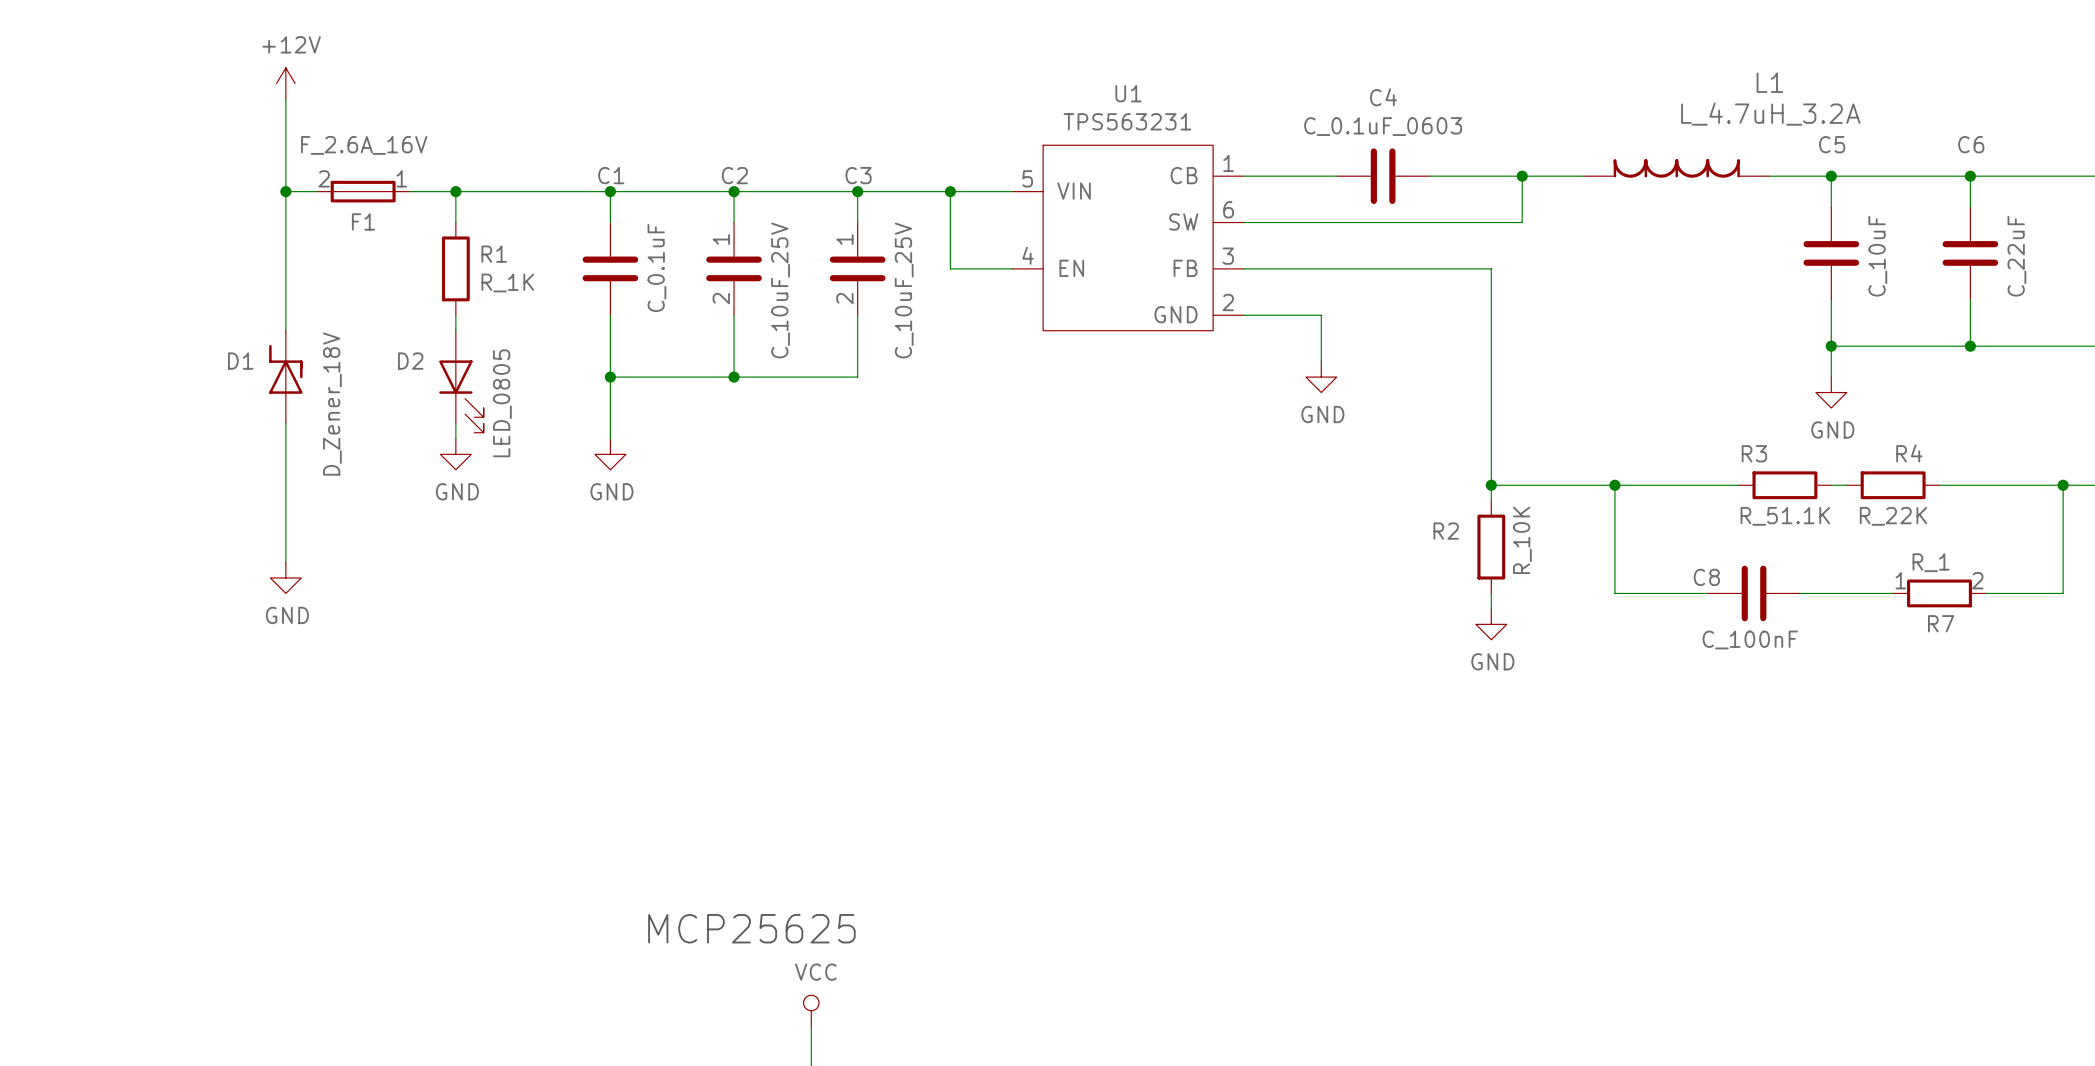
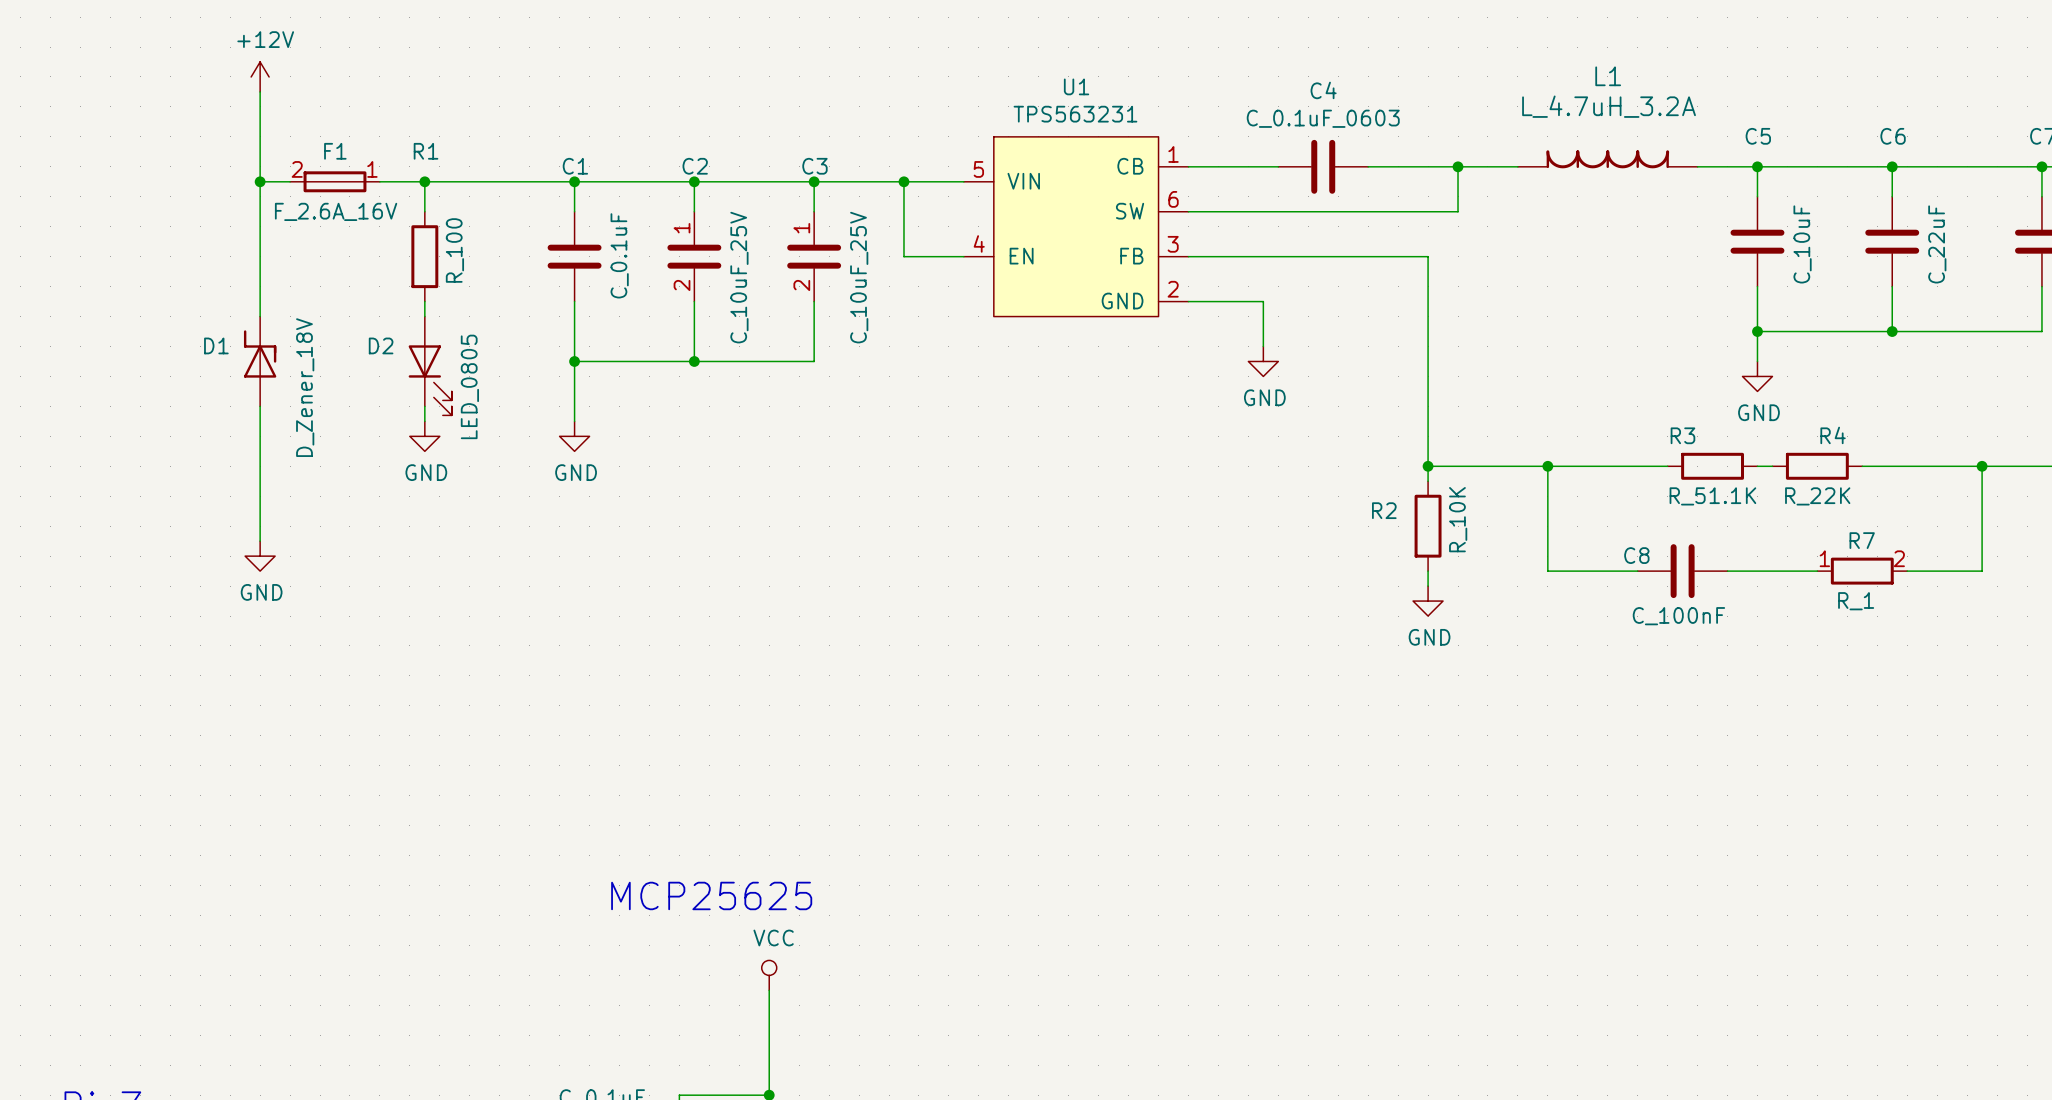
L1 name position: L1 (1769, 82) -> L1 (1608, 76)
L1 value position: L_4.7uH_3.2A (1770, 114) -> L_4.7uH_3.2A (1609, 106)
F1 value position: F_2.6A_16V (364, 145) -> F_2.6A_16V (336, 211)
F1 name position: F1 (363, 221) -> F1 (335, 151)
R1 name position: R1 (494, 254) -> R1 (426, 151)
R1 value: R_1K (507, 282) -> R_100 (454, 250)
R7 value position: R_1 (1931, 562) -> R_1 (1856, 601)
R7 name position: R7 (1941, 623) -> R7 (1862, 540)

